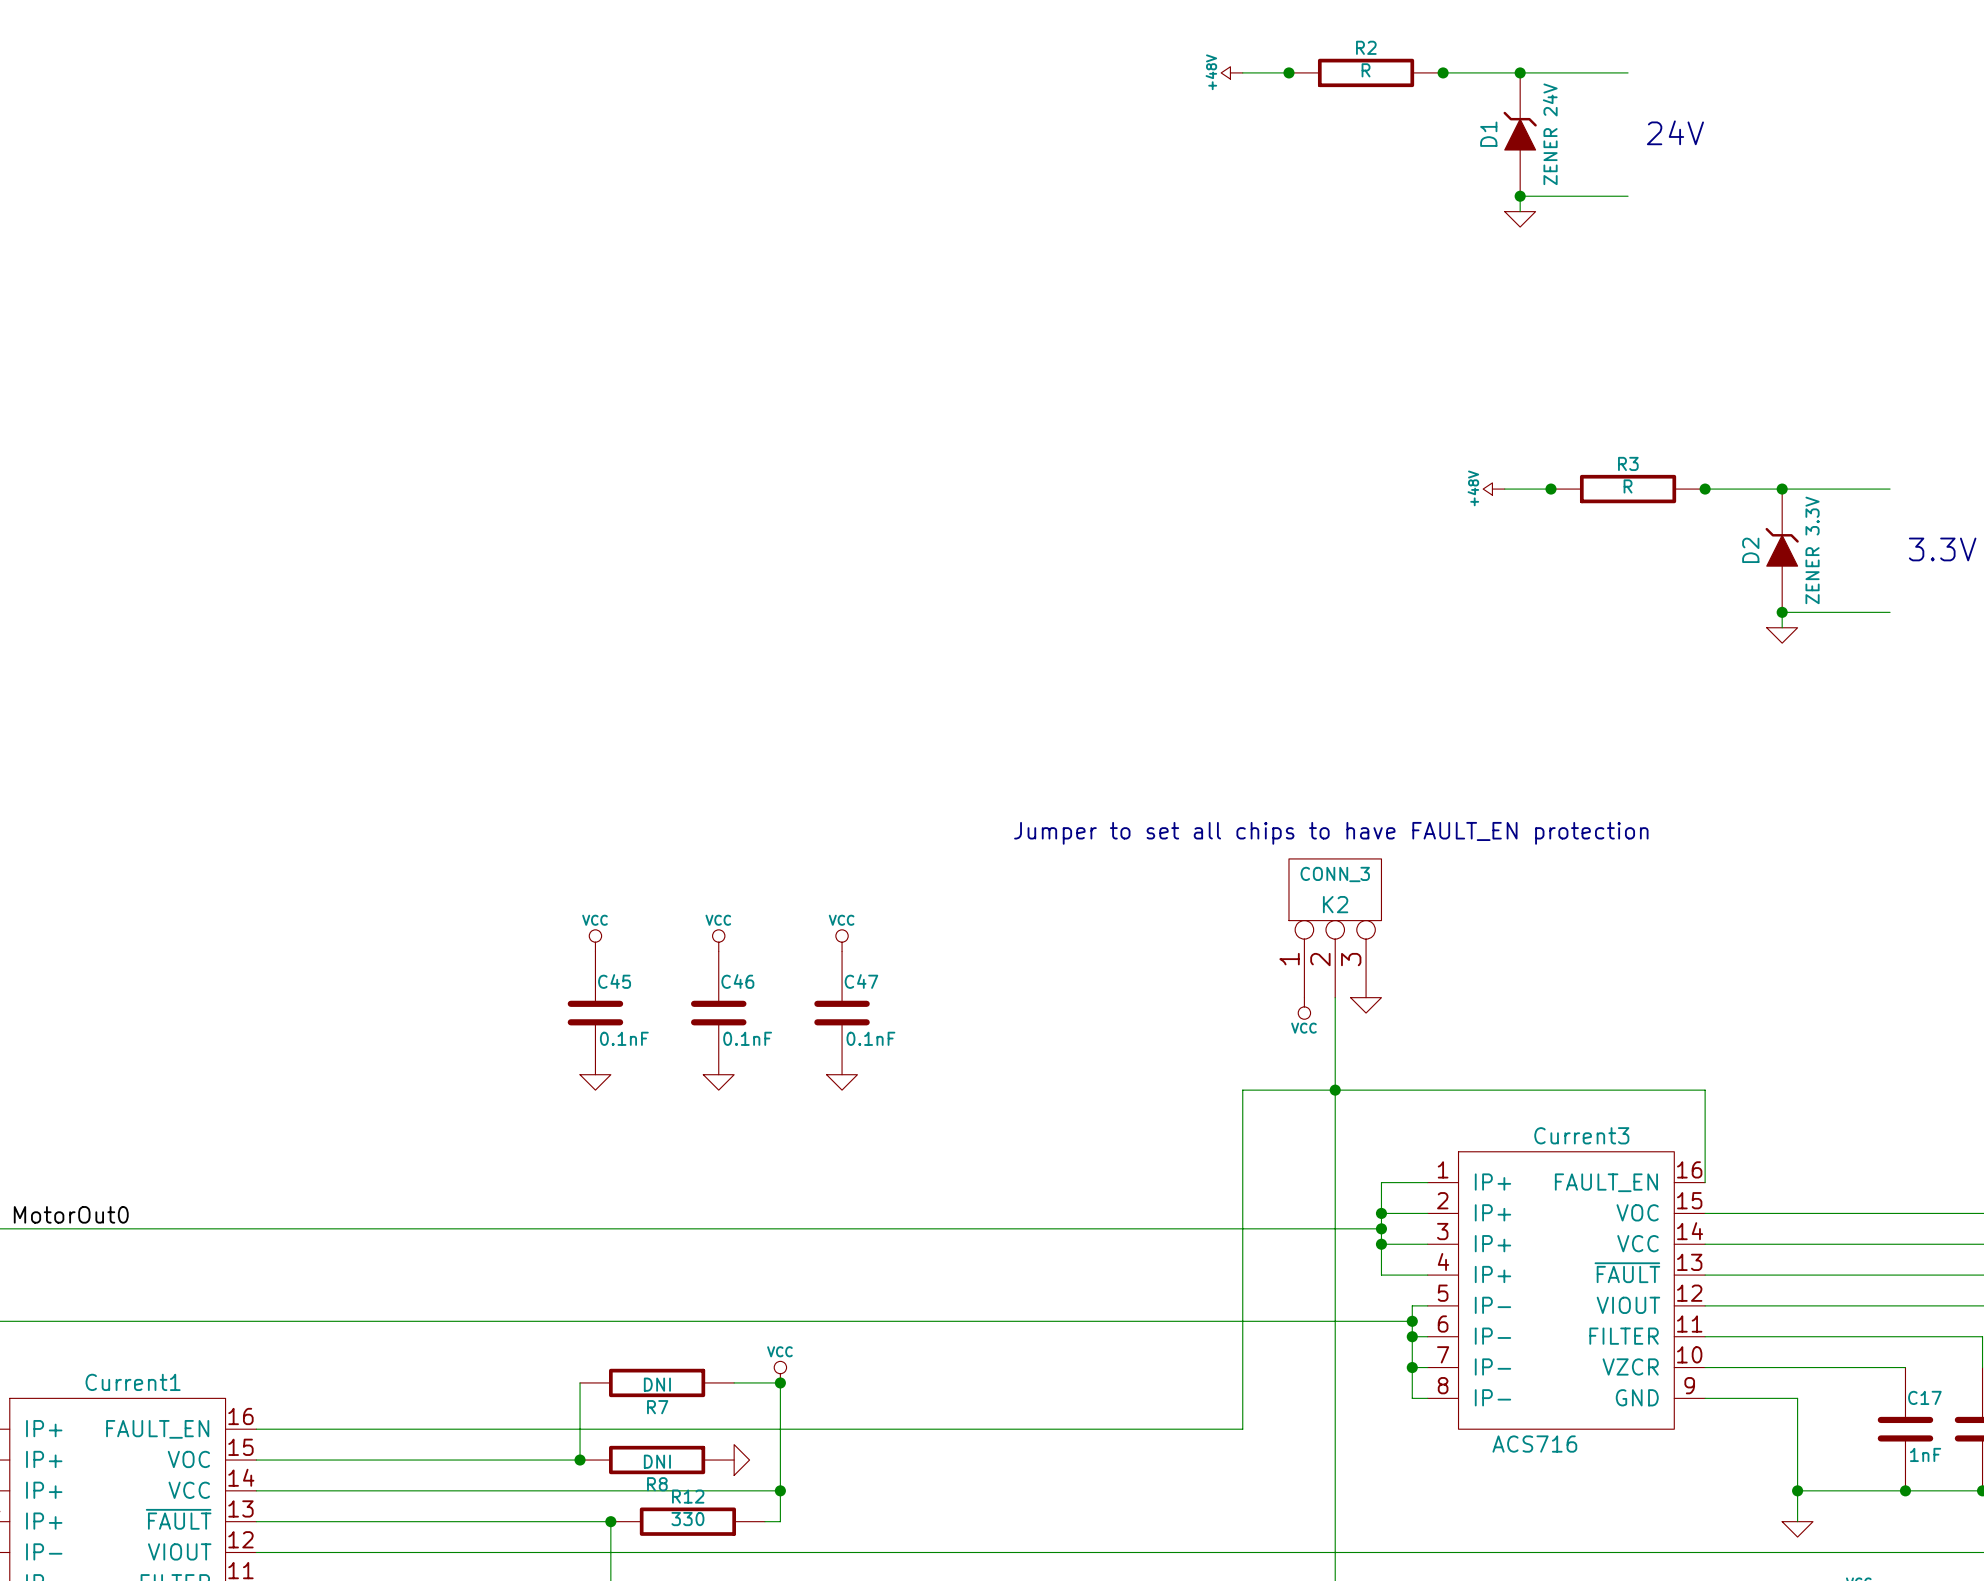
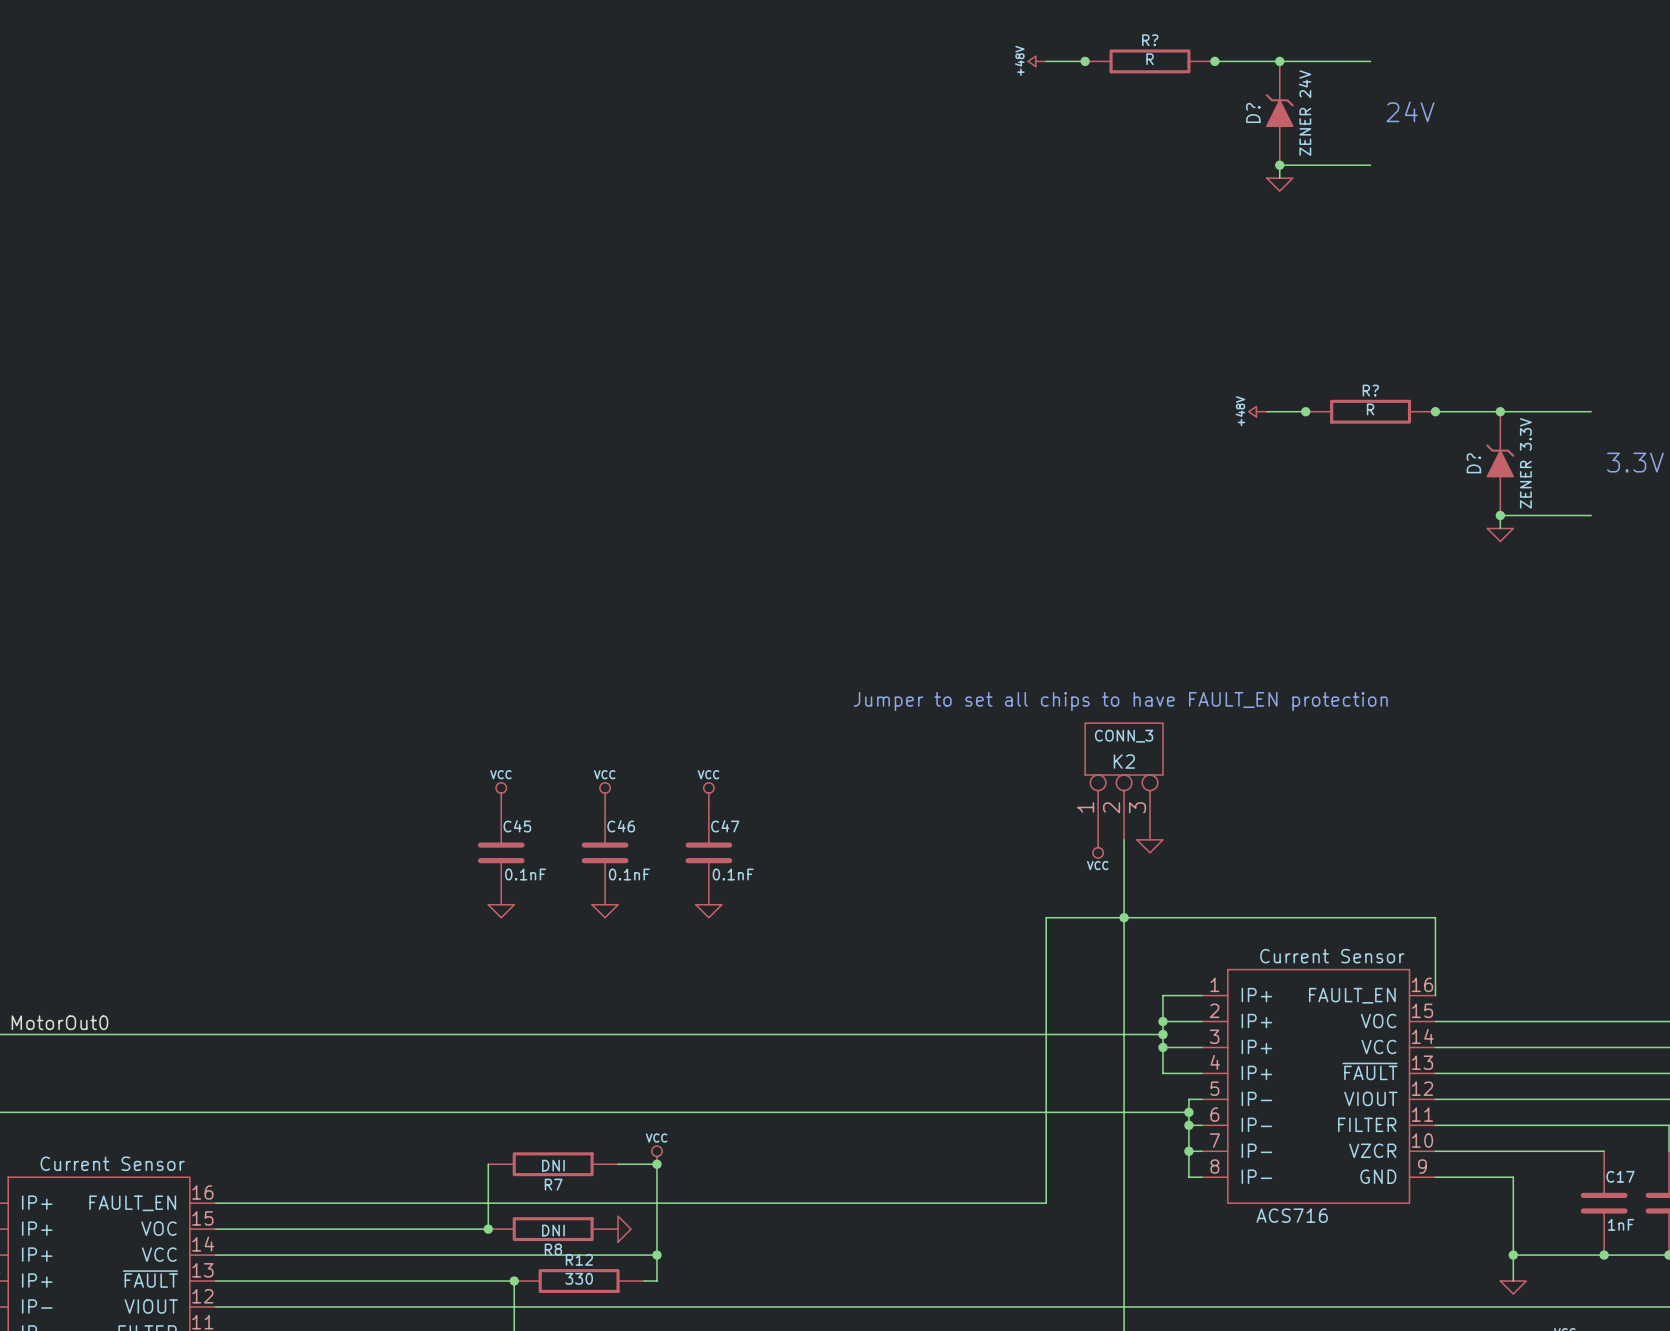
R2 name: R2 (1366, 47) -> R? (1150, 40)
D1 name: D1 (1488, 134) -> D? (1253, 112)
R3 name: R3 (1628, 463) -> R? (1370, 390)
D2 name: D2 (1750, 550) -> D? (1473, 463)
Current3 name: Current3 (1581, 1135) -> Current Sensor (1332, 956)
Current1 name: Current1 (133, 1382) -> Current Sensor (112, 1163)

